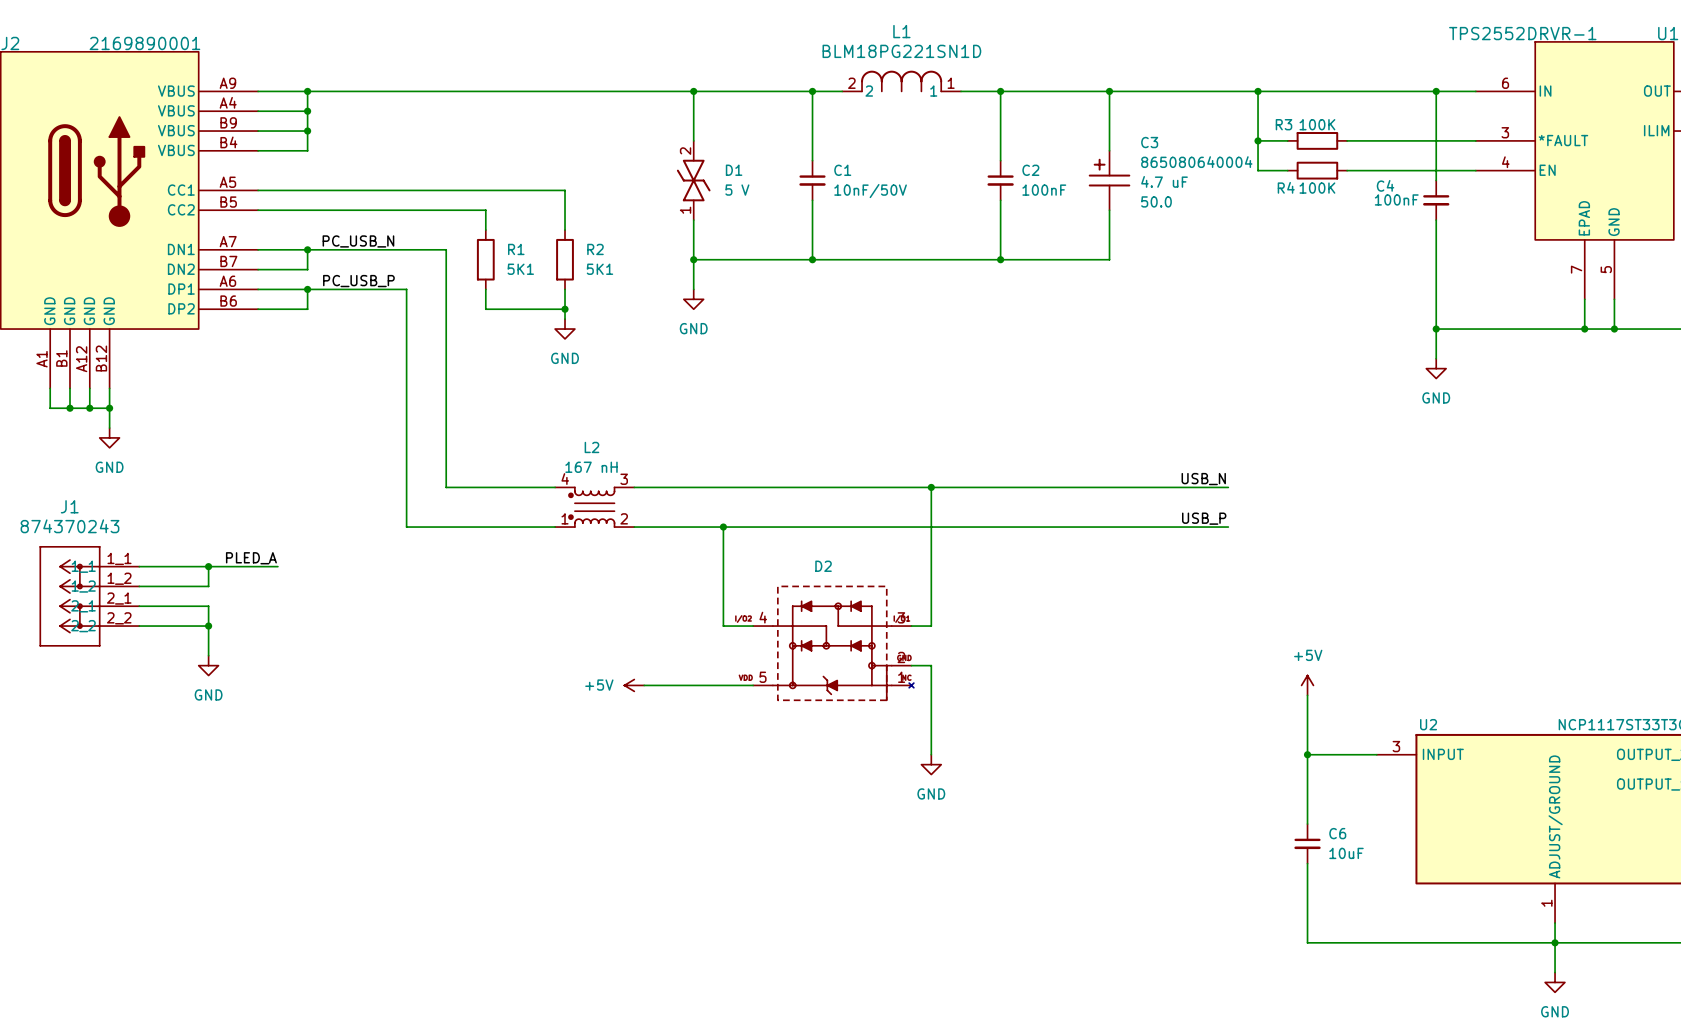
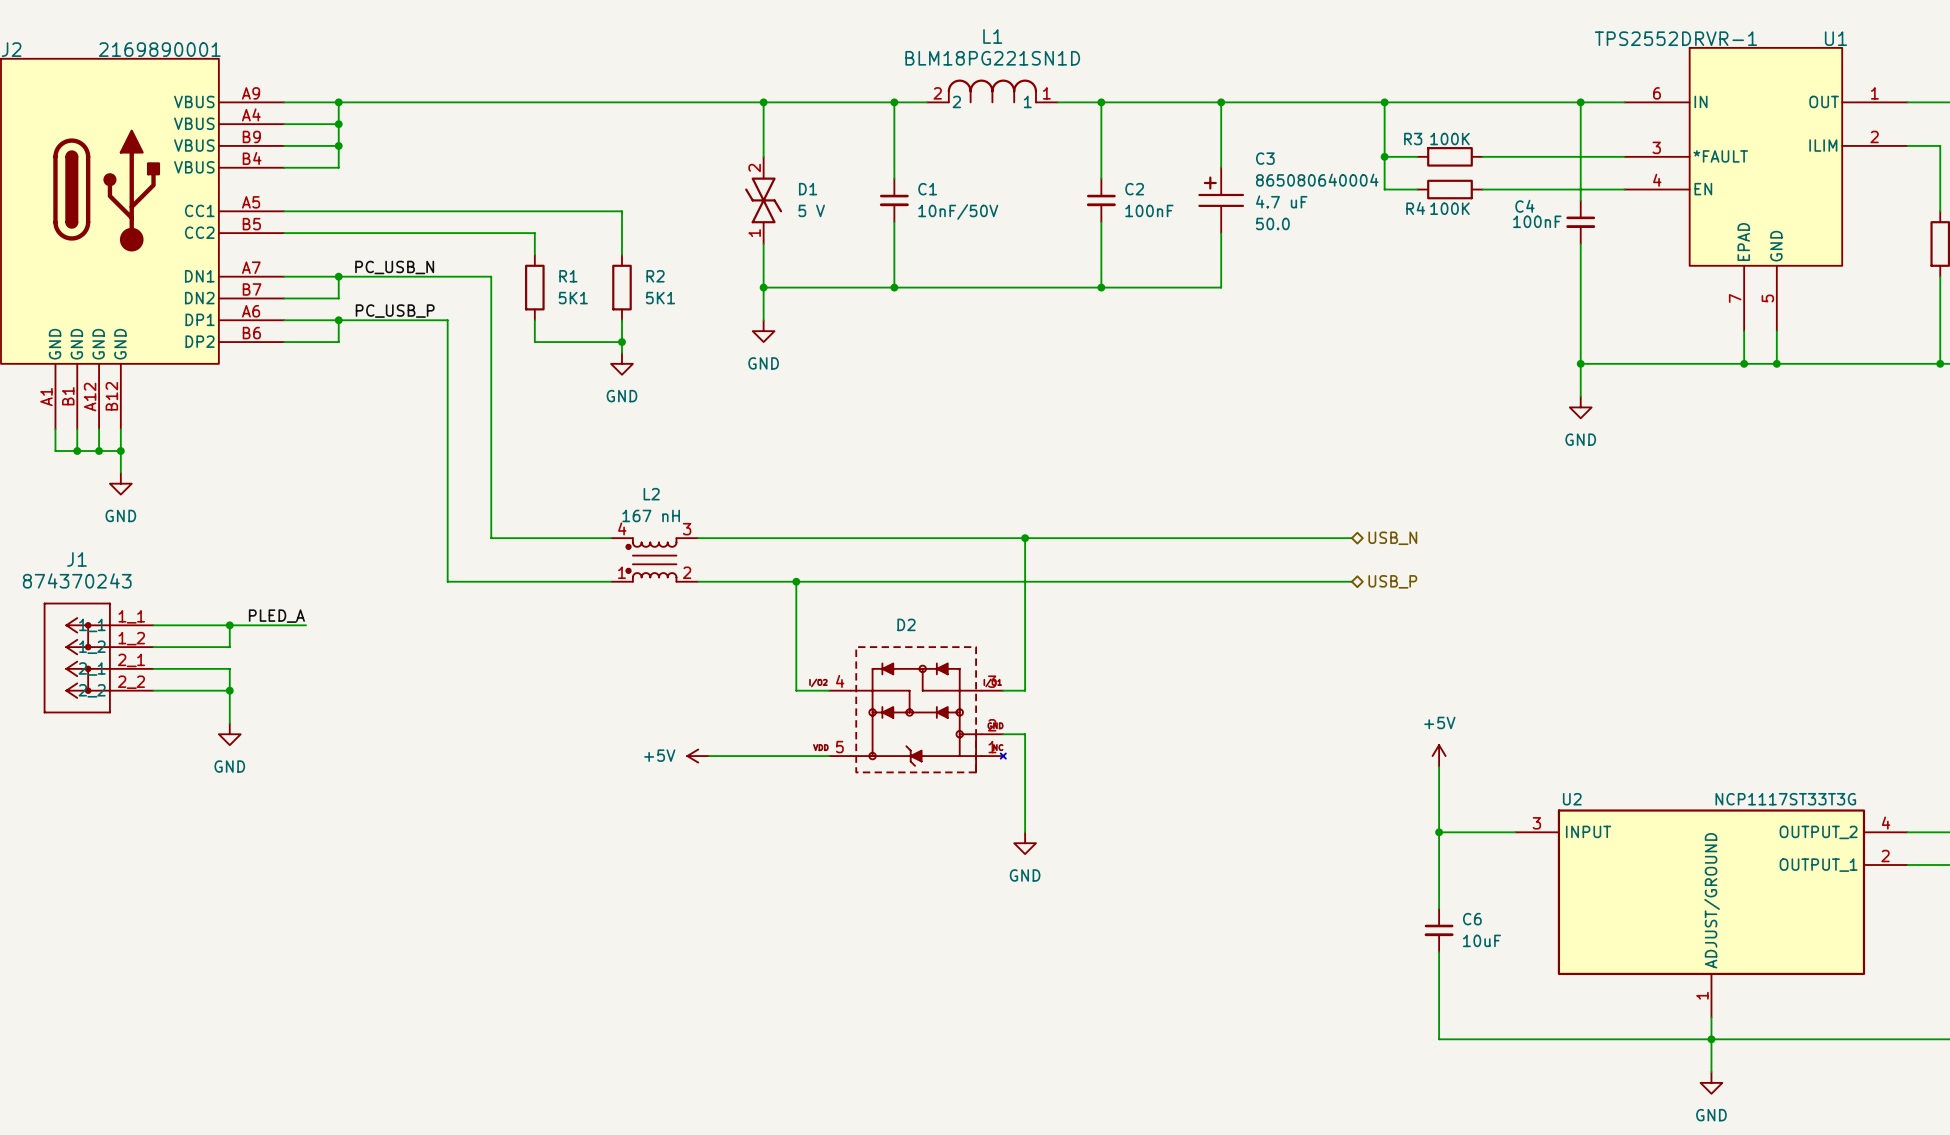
label: USB_N (1203, 479) -> none
hierarchical label: none -> USB_N (1392, 538)
label: USB_P (1204, 518) -> none
hierarchical label: none -> USB_P (1392, 581)

